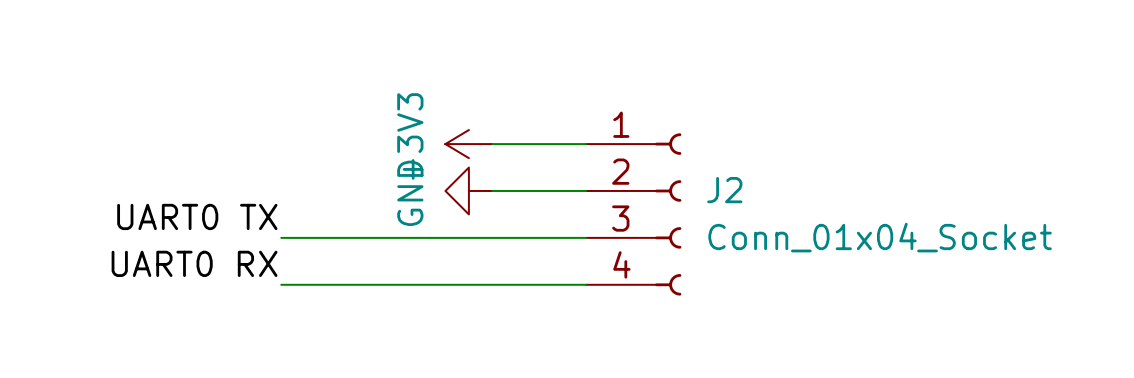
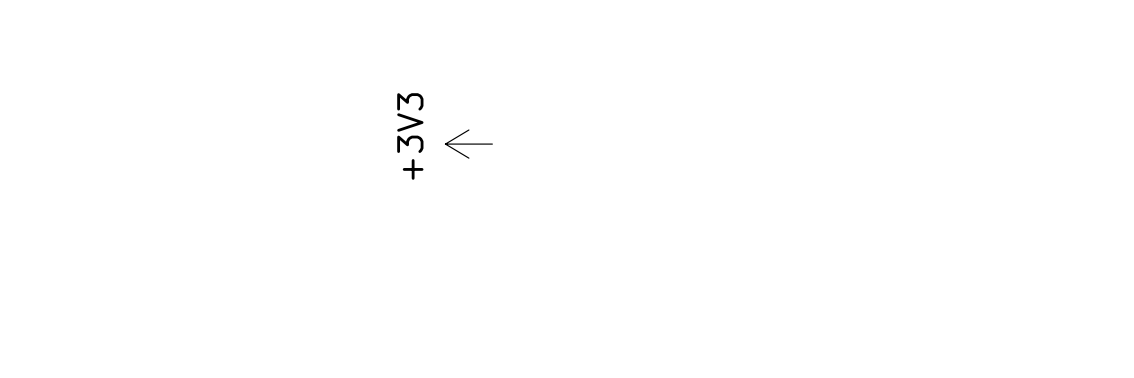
wire: (492, 144) (586, 144) -> none
power symbol: GND (468, 190) -> none
wire: (492, 190) (586, 190) -> none
J2: Conn_01x04_Socket (633, 214) -> none
label: UART0 TX (197, 216) -> none
wire: (281, 237) (586, 237) -> none
label: UART0 RX (194, 263) -> none
wire: (281, 284) (586, 284) -> none

